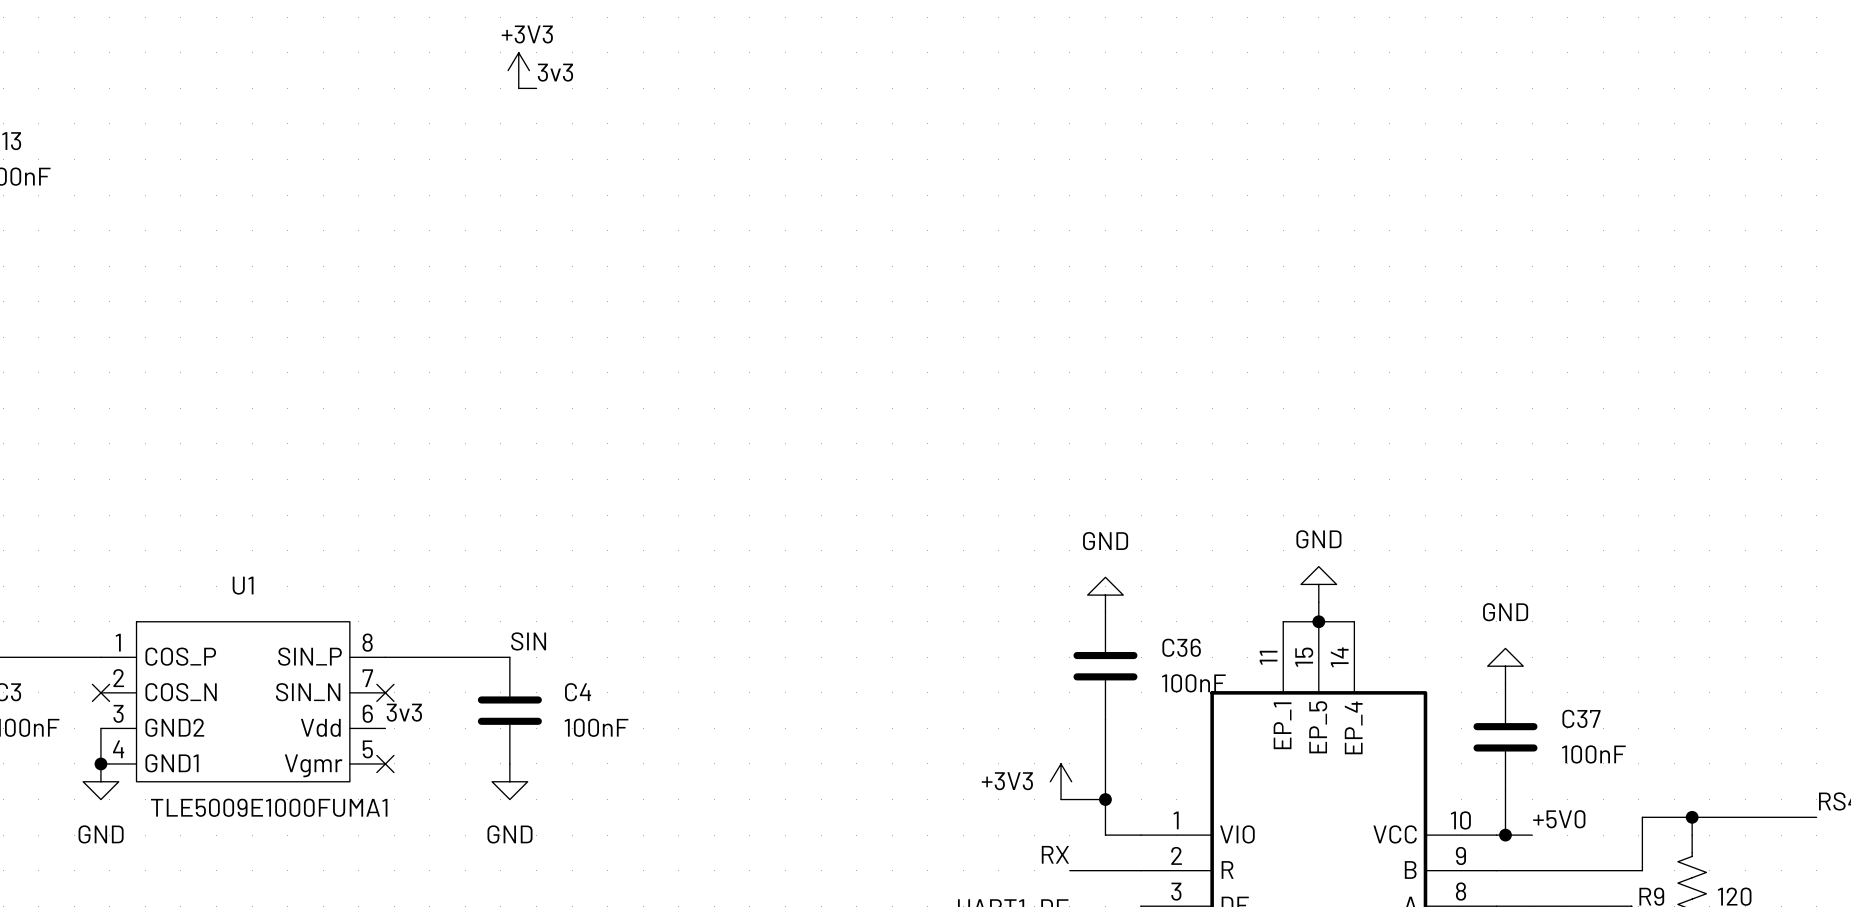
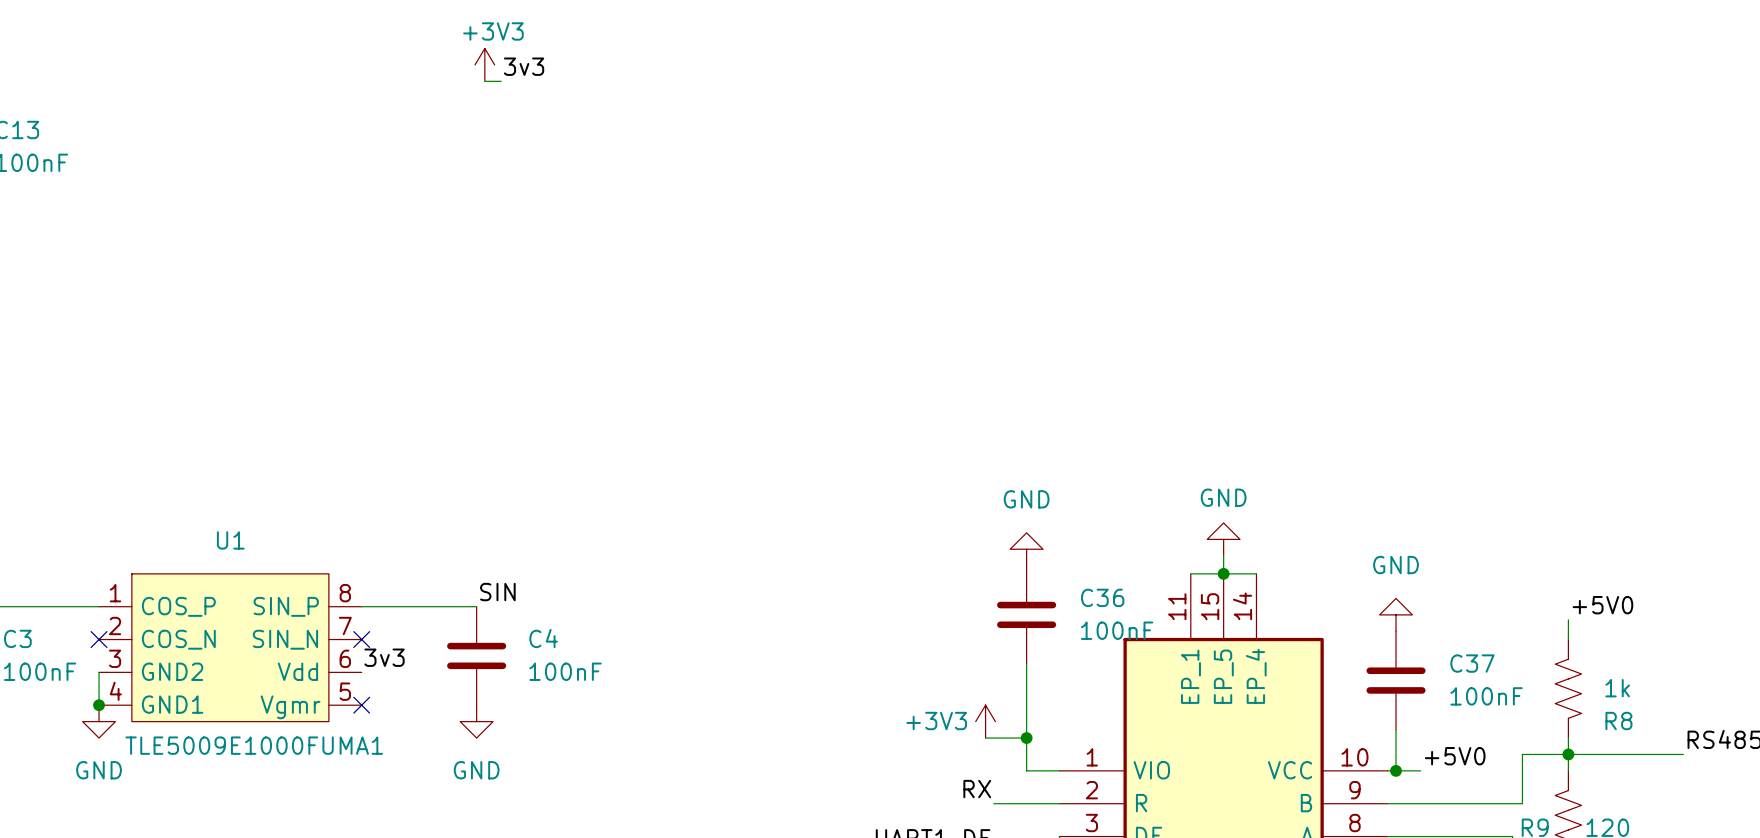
label: none -> +5V0 (1602, 605)
wire: none -> (1568, 619) (1568, 639)
R8: none -> 1k (1568, 688)
wire: none -> (1568, 738) (1568, 754)

